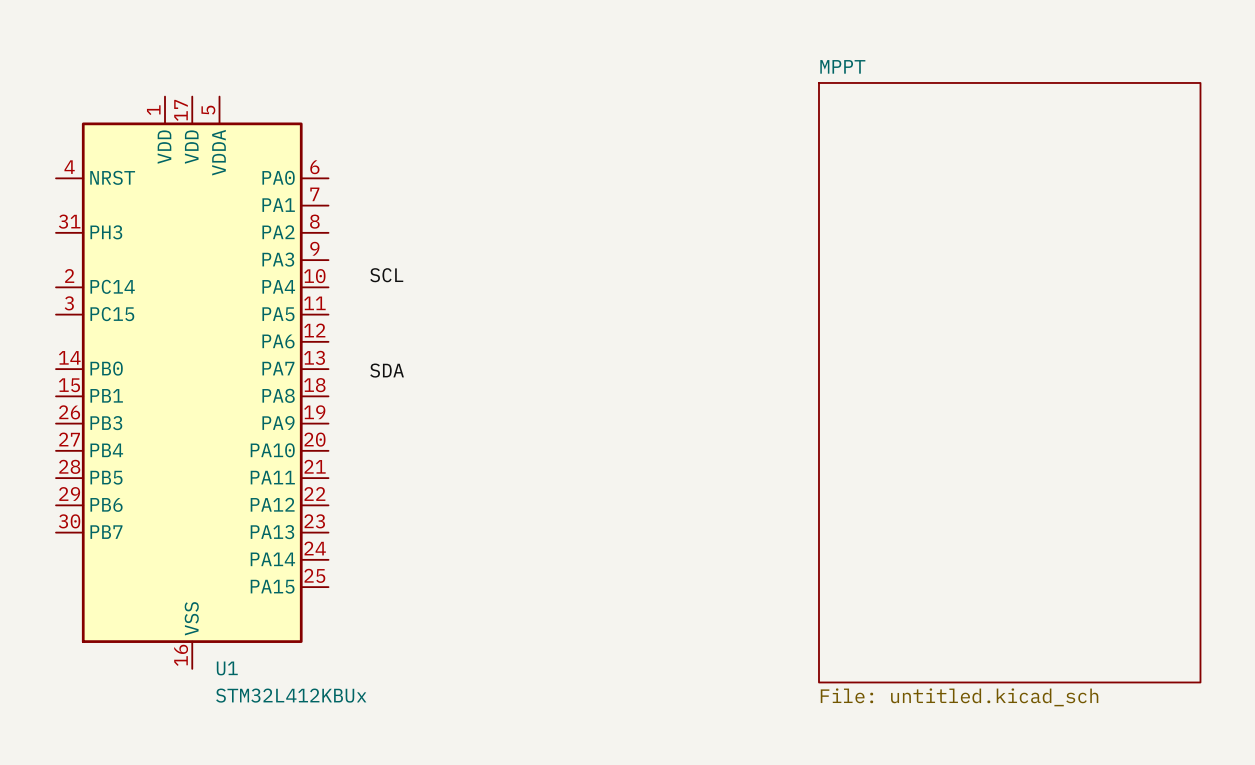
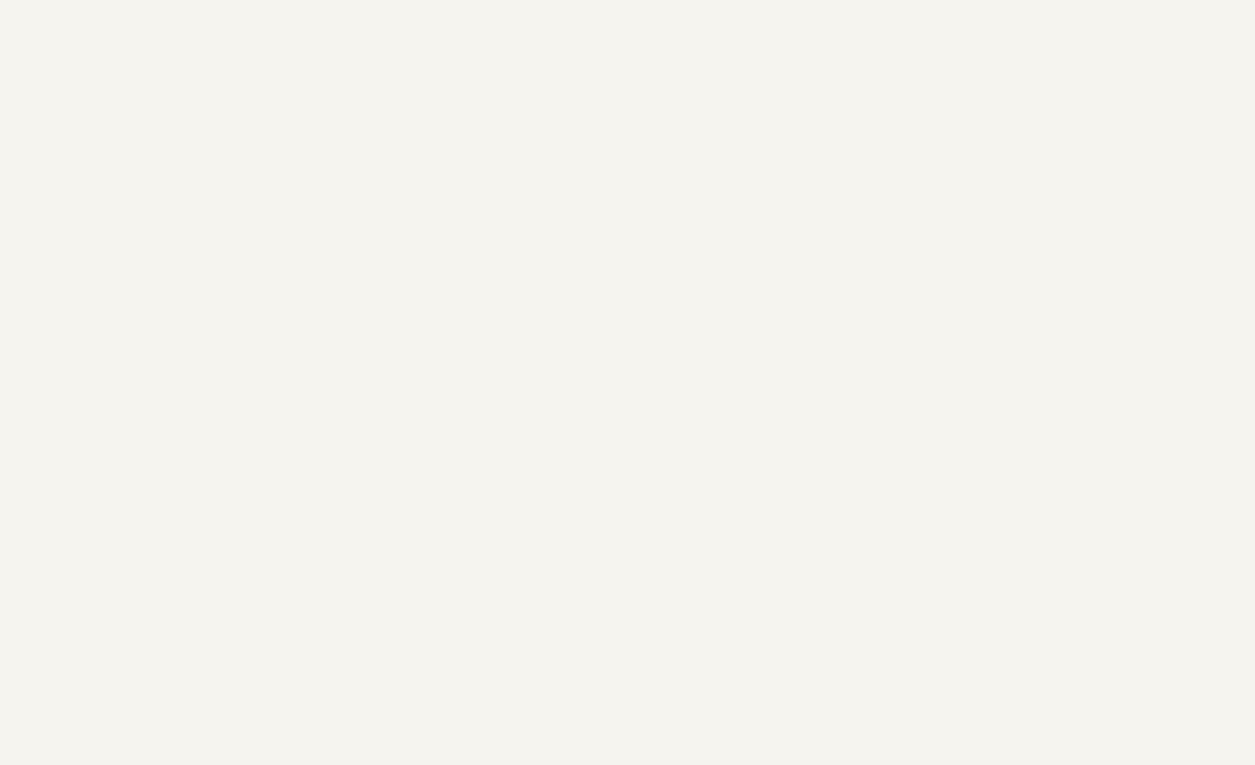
label: SCL (386, 275) -> none
label: SDA (387, 370) -> none
U1: STM32L412KBUx (192, 382) -> none
sheet MPPT: File: untitled.kicad_sch (1009, 382) -> none

